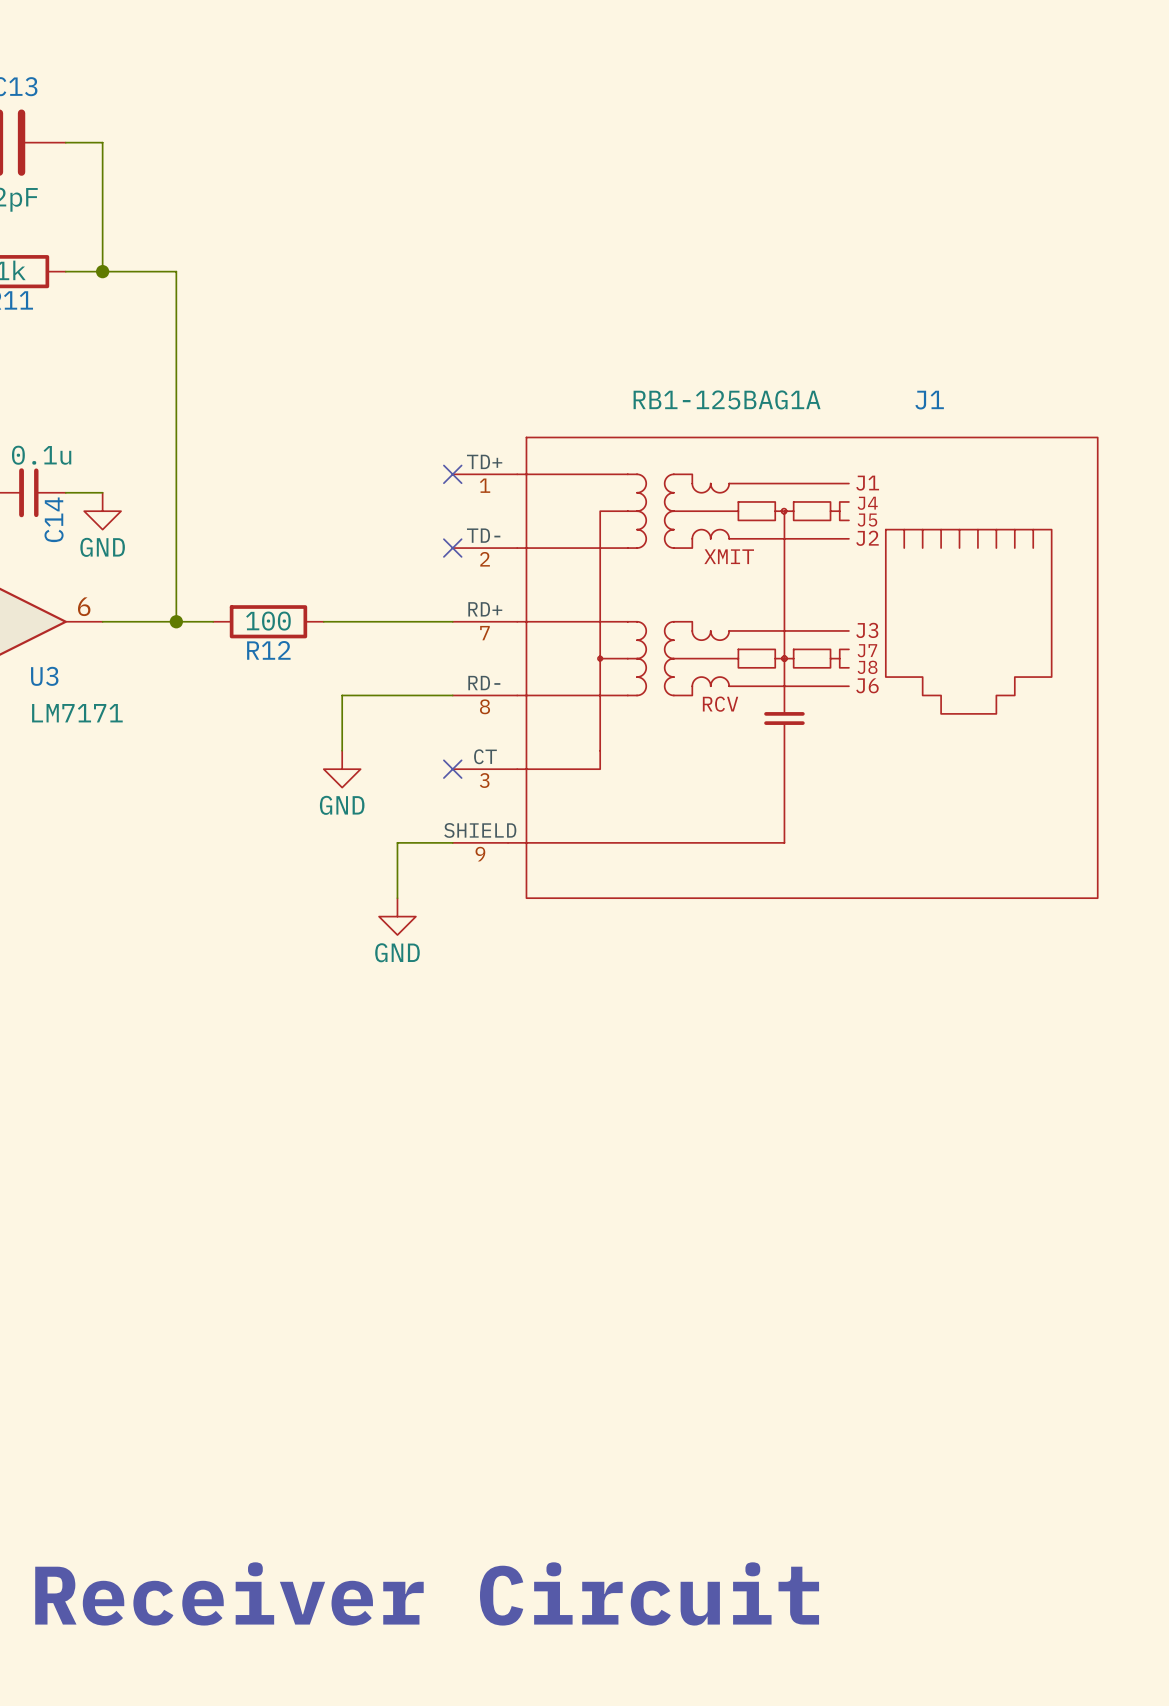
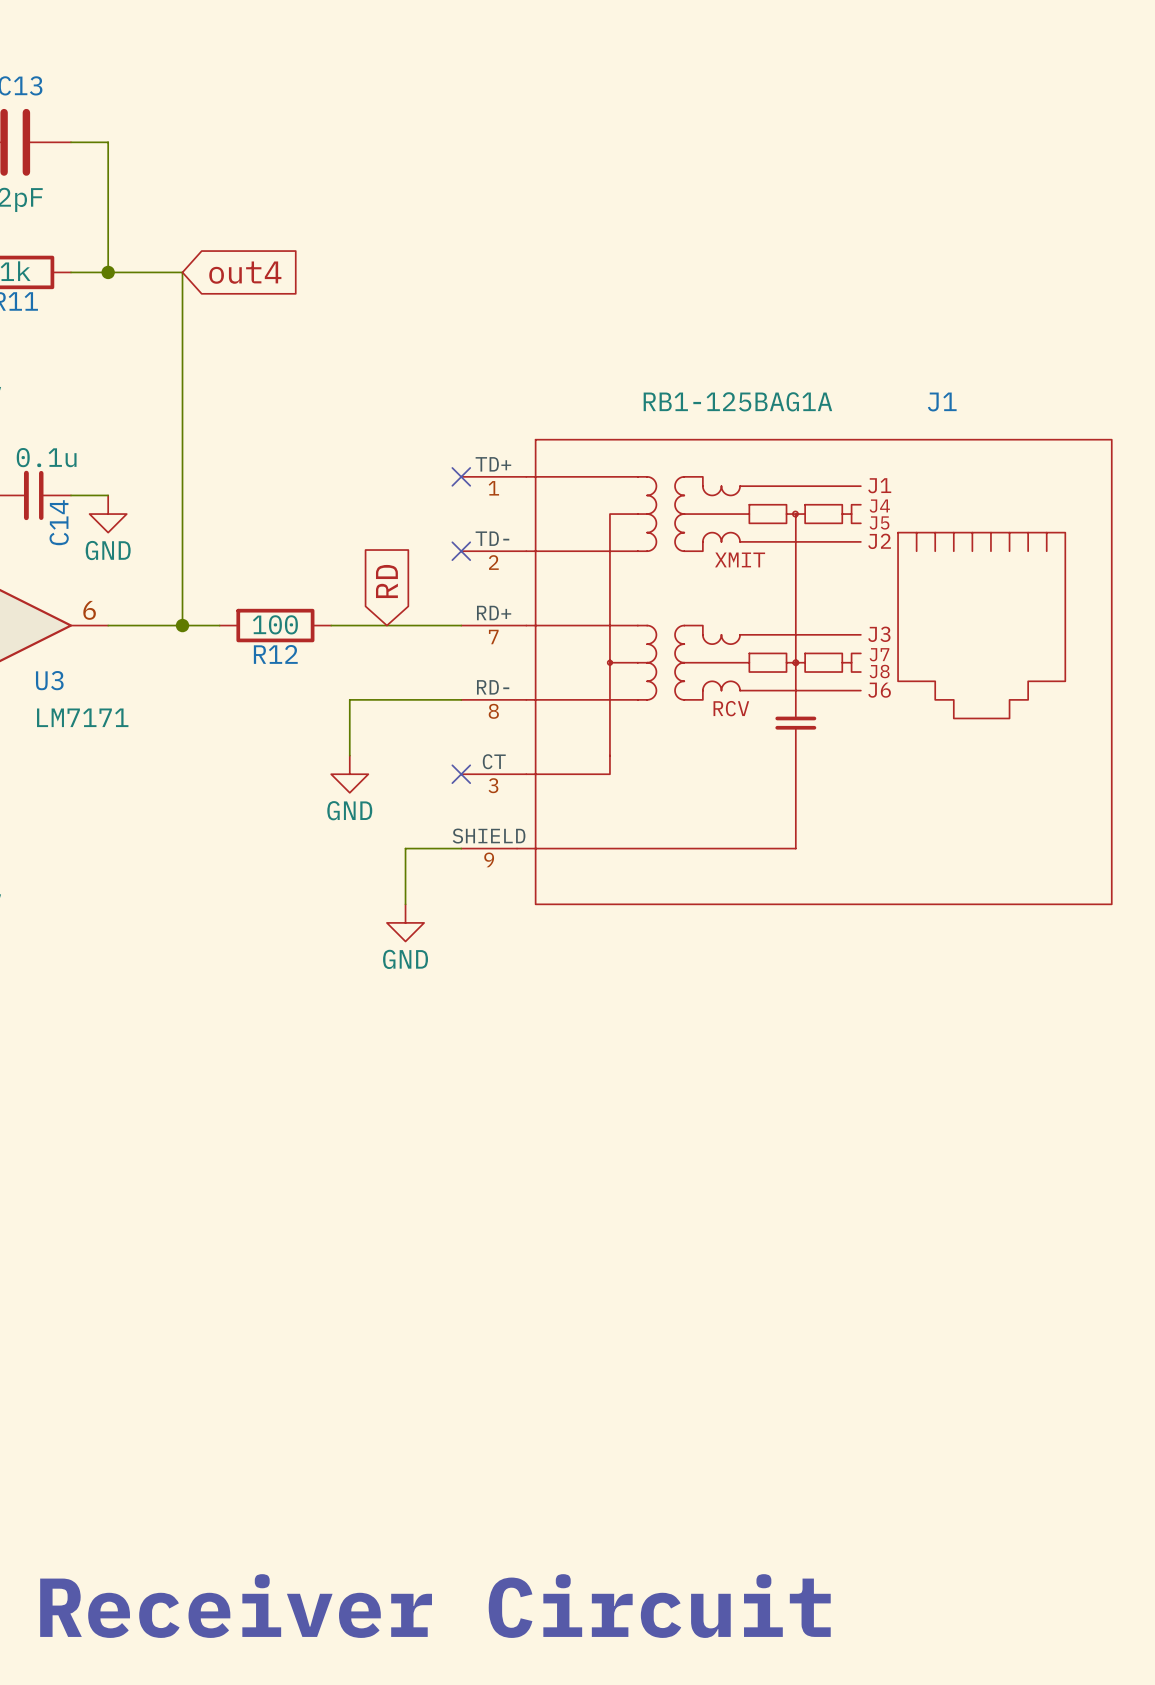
global label: none -> out4 (245, 272)
global label: none -> RD (386, 581)

